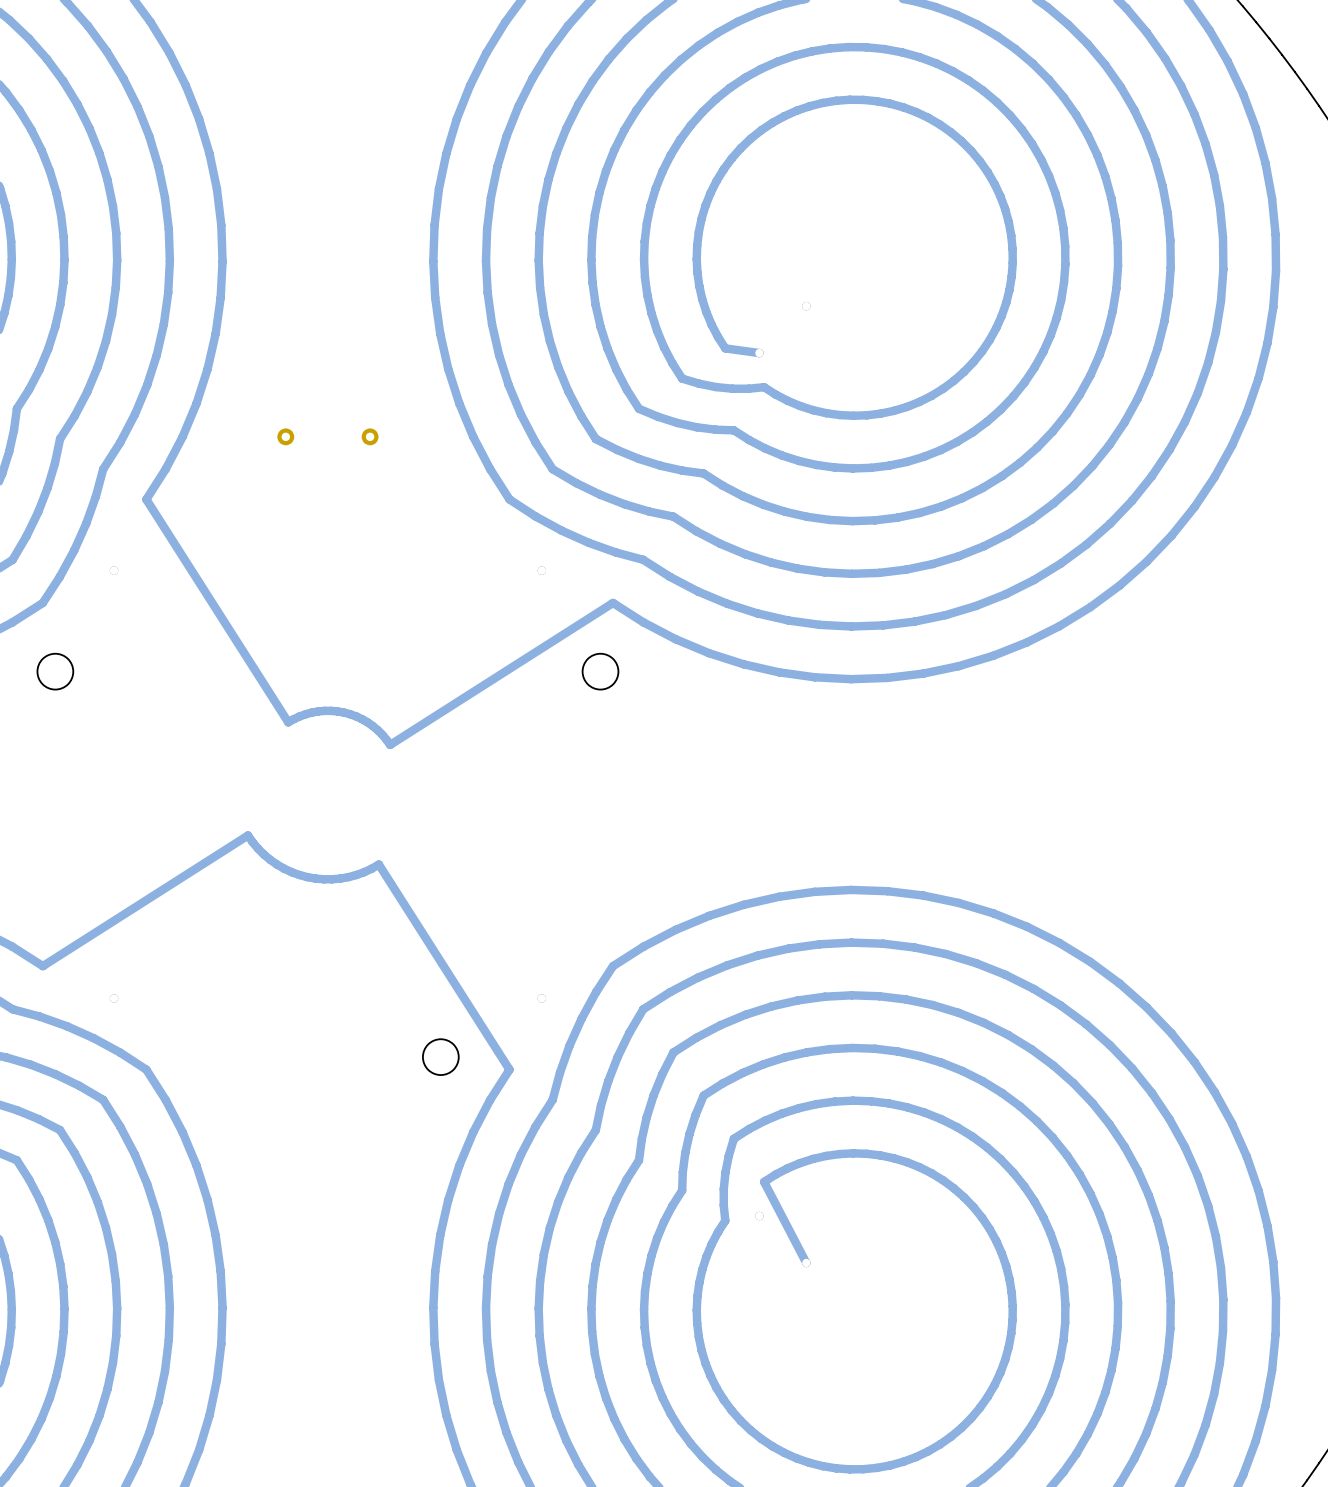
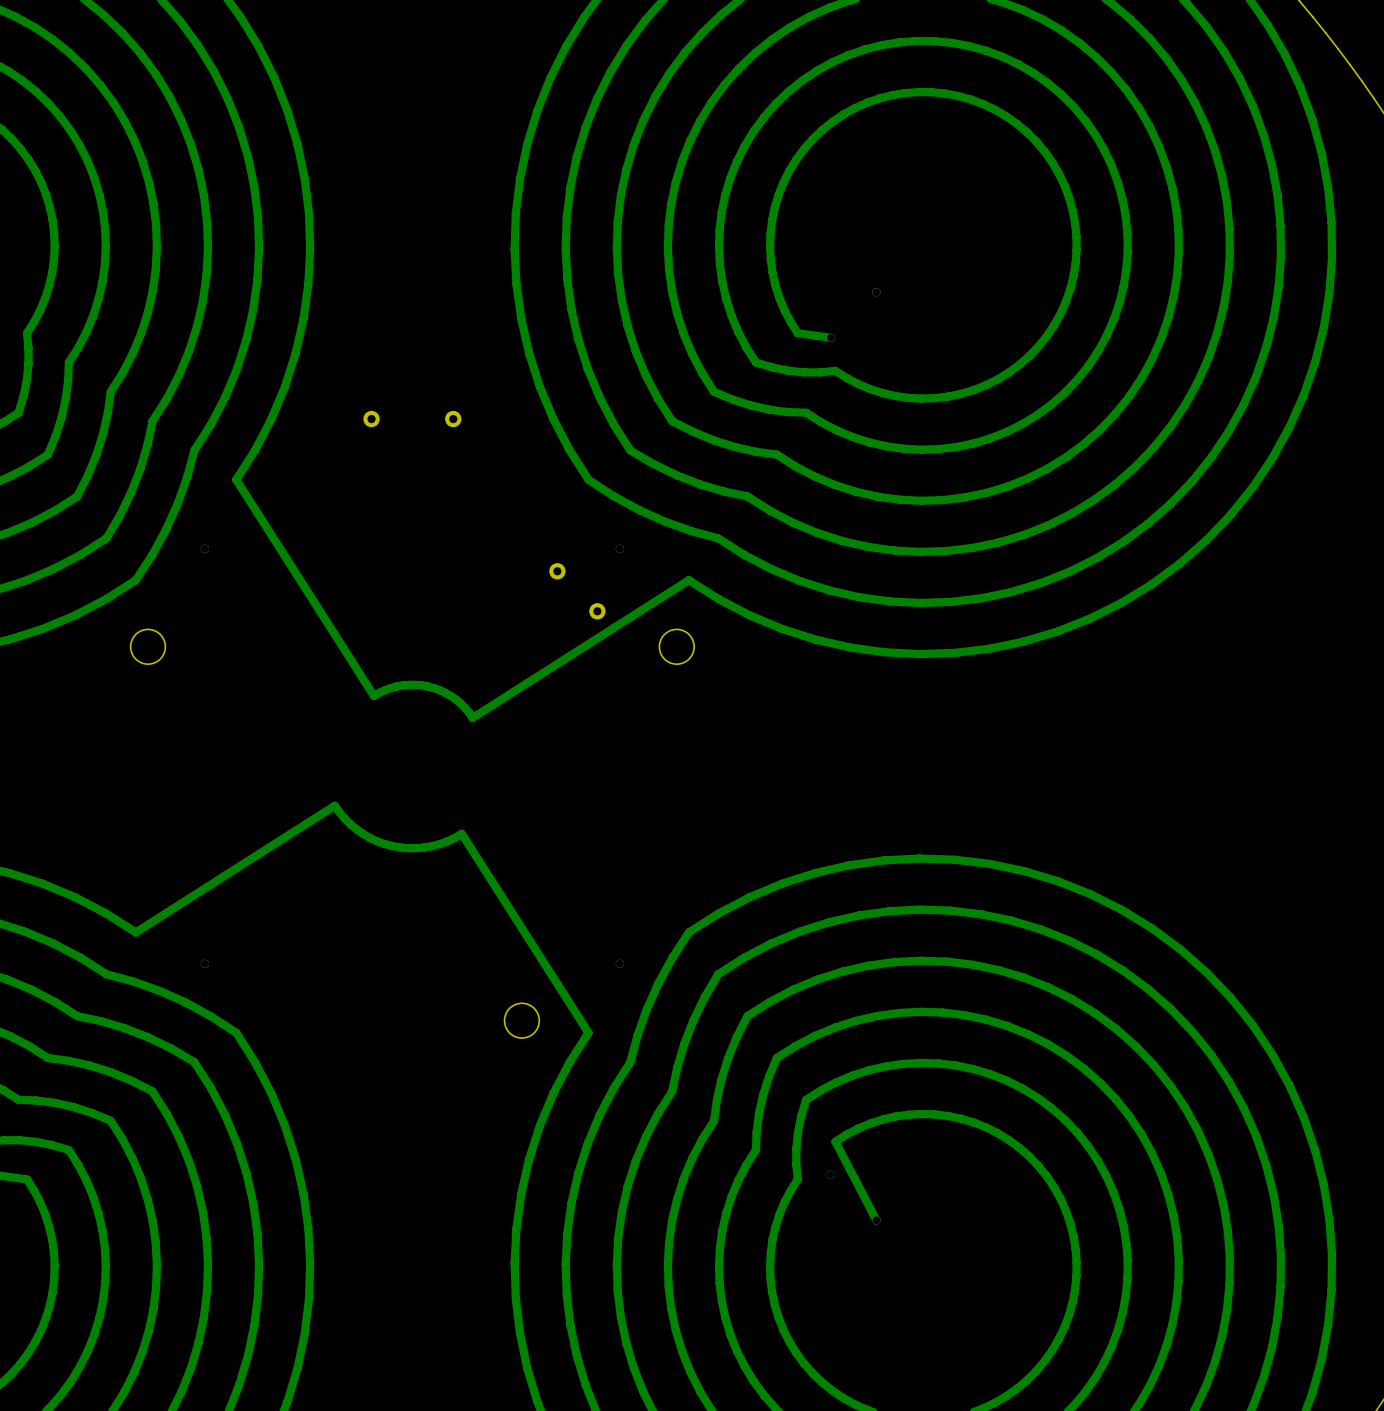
part: none -> (557, 571)
part: none -> (597, 611)

